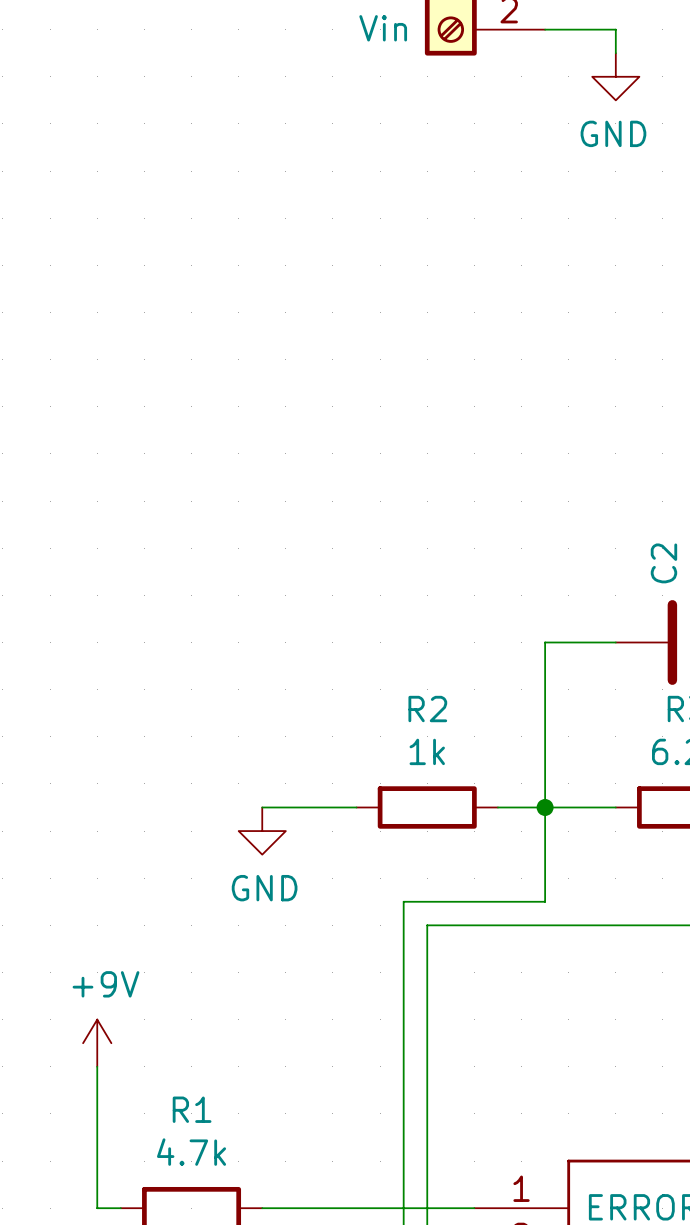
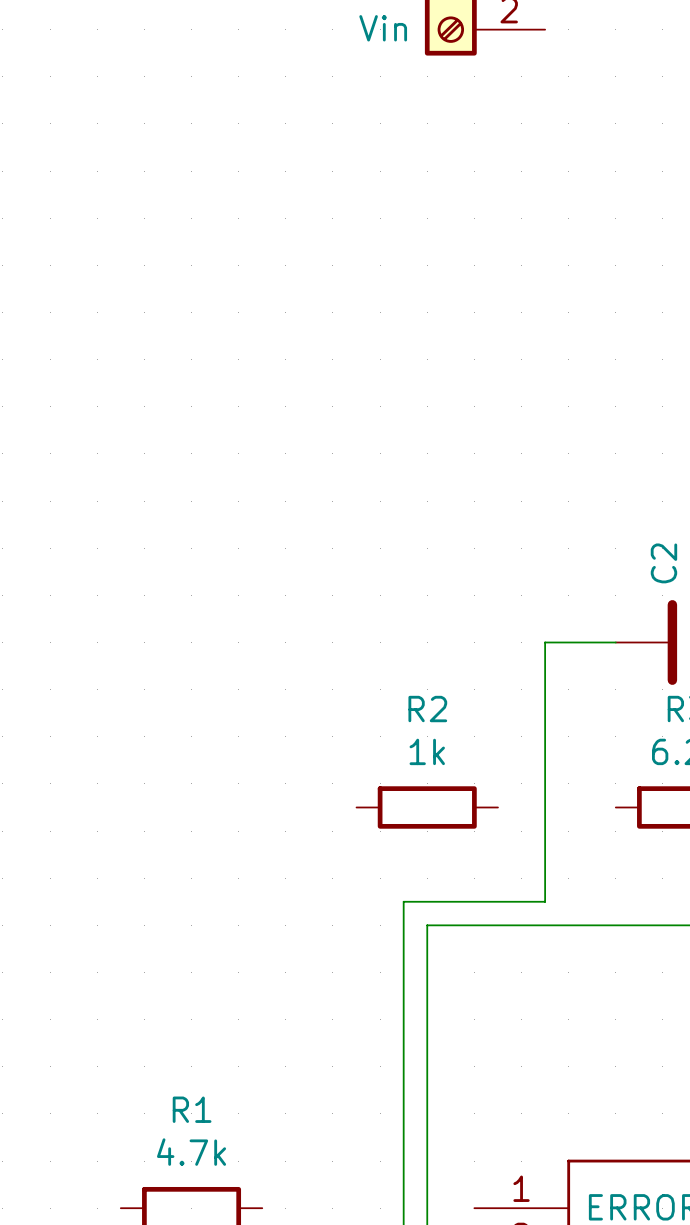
wire: (545, 29) (615, 29) (615, 53) -> none
power symbol: GND (615, 76) -> none
wire: (262, 807) (356, 807) -> none
wire: (497, 807) (615, 807) -> none
junction: (545, 807) -> none
power symbol: GND (262, 831) -> none
power symbol: +9V (97, 1043) -> none
wire: (97, 1066) (97, 1208) (120, 1208) -> none
wire: (262, 1208) (474, 1208) -> none

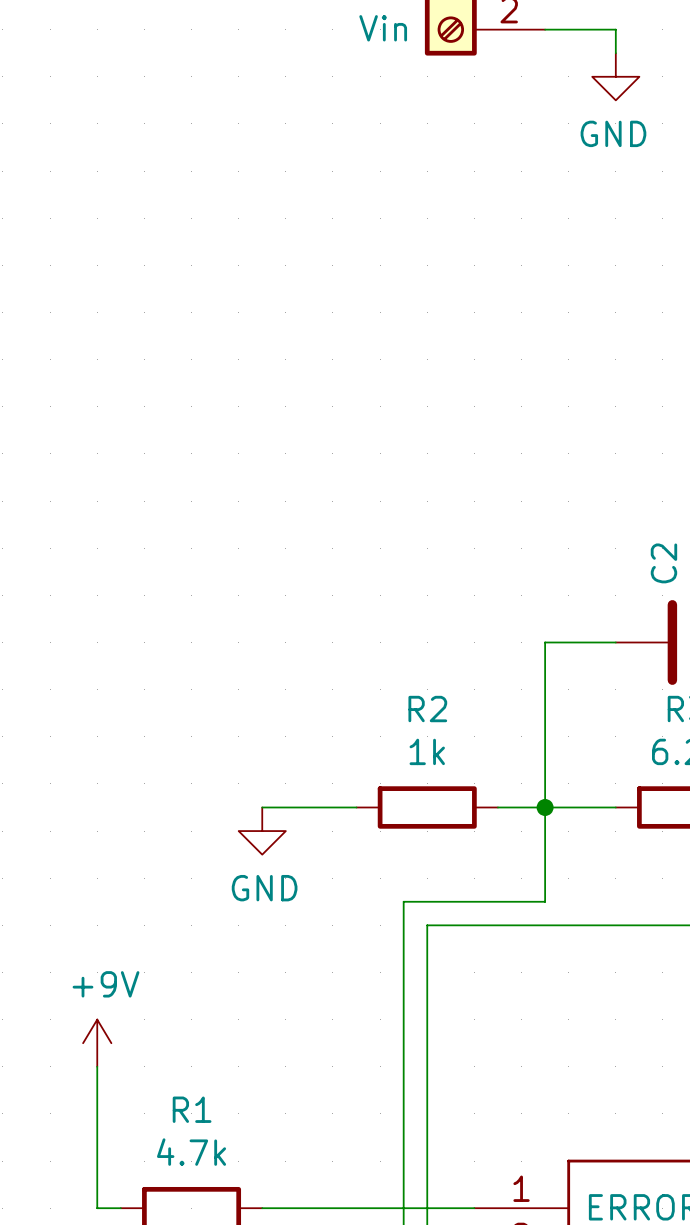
wire: none -> (545, 29) (615, 29) (615, 53)
power symbol: none -> GND (615, 76)
wire: none -> (262, 807) (356, 807)
wire: none -> (497, 807) (615, 807)
junction: none -> (545, 807)
power symbol: none -> GND (262, 831)
power symbol: none -> +9V (97, 1043)
wire: none -> (97, 1066) (97, 1208) (120, 1208)
wire: none -> (262, 1208) (474, 1208)

